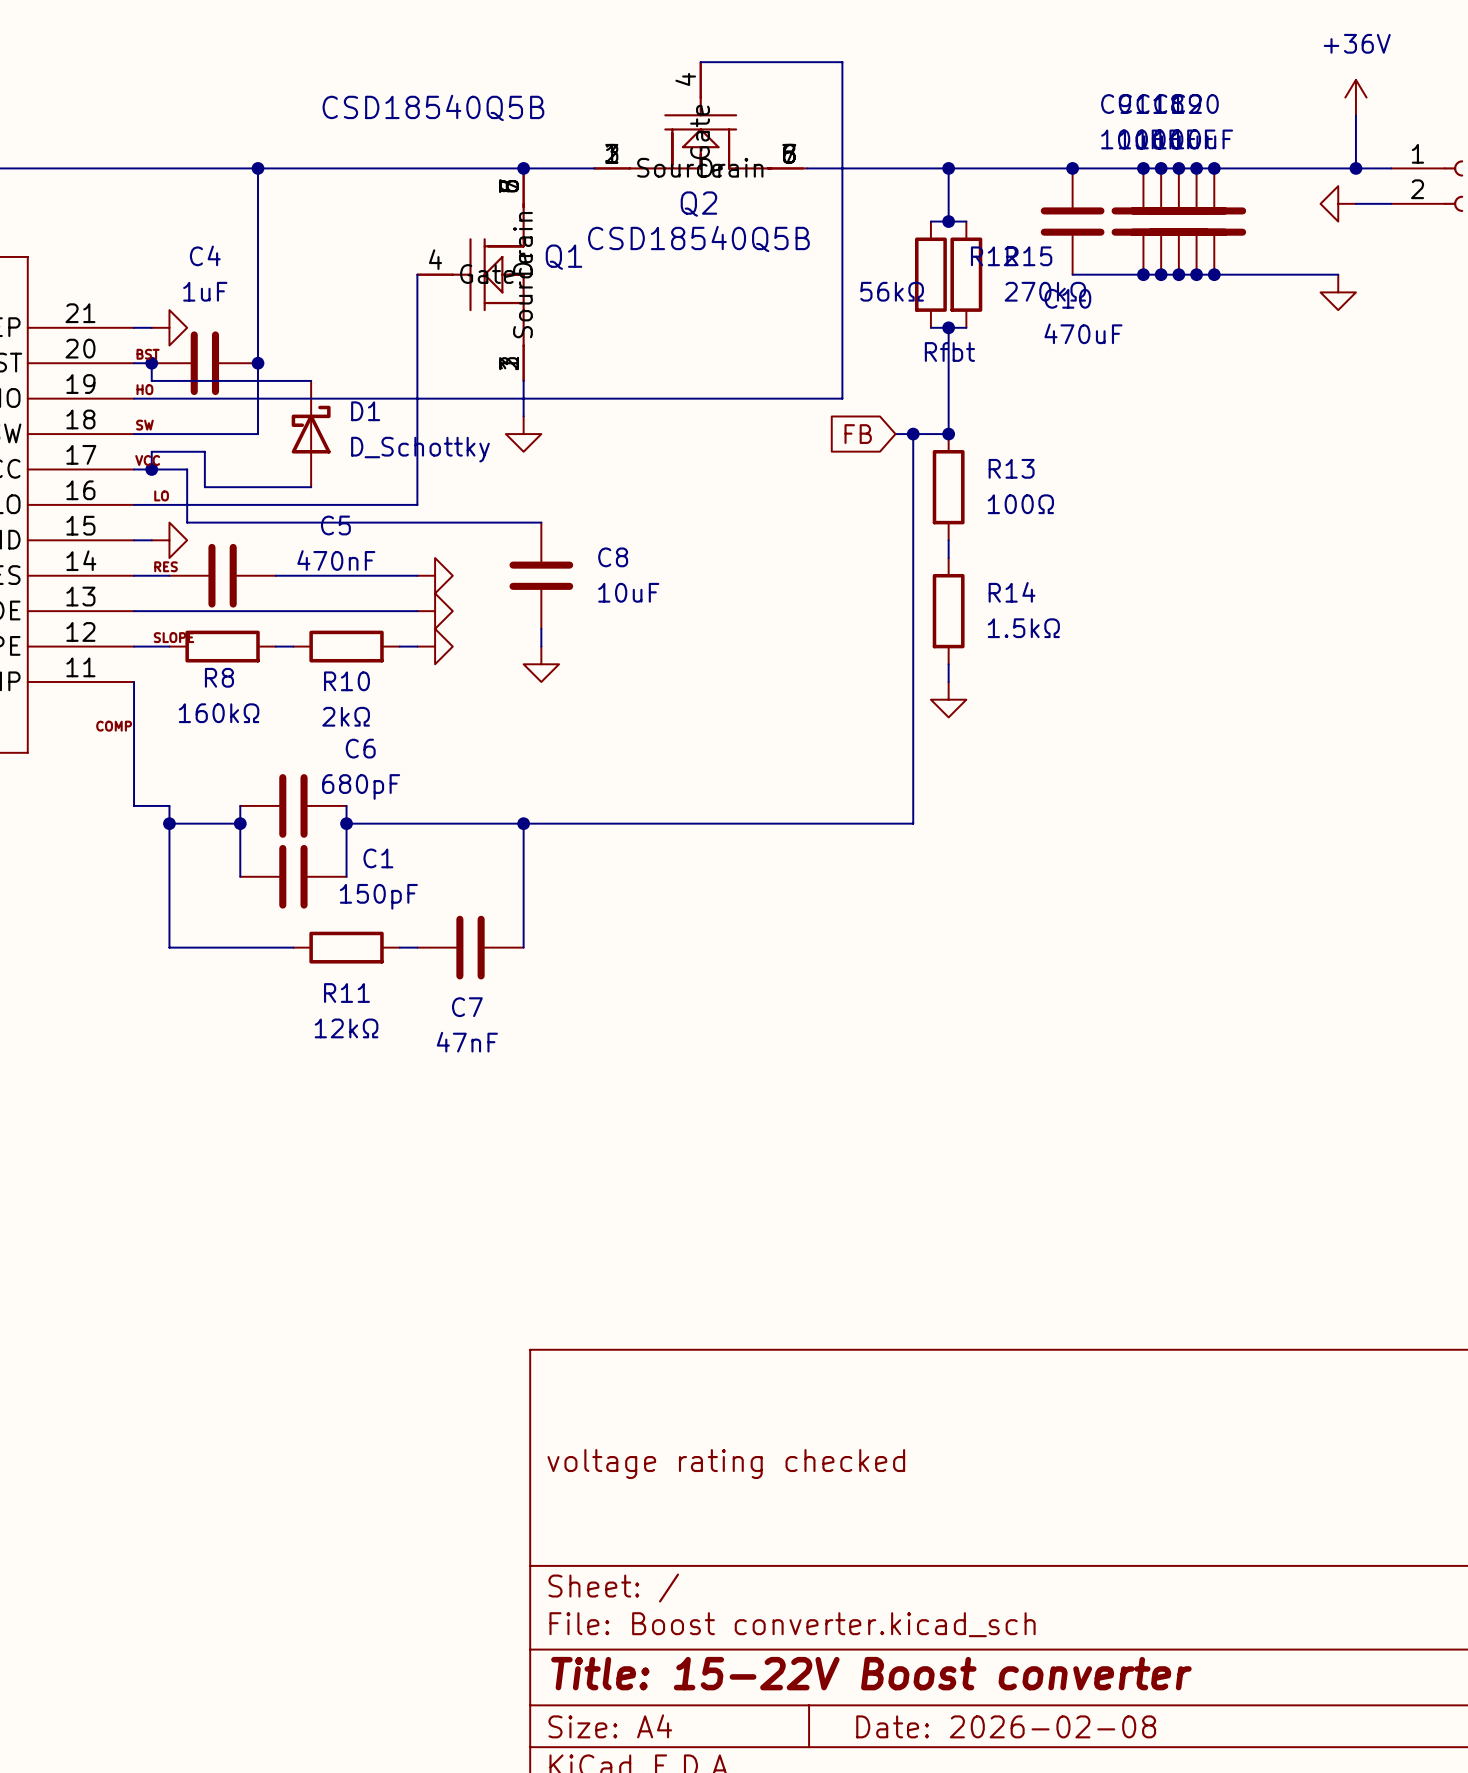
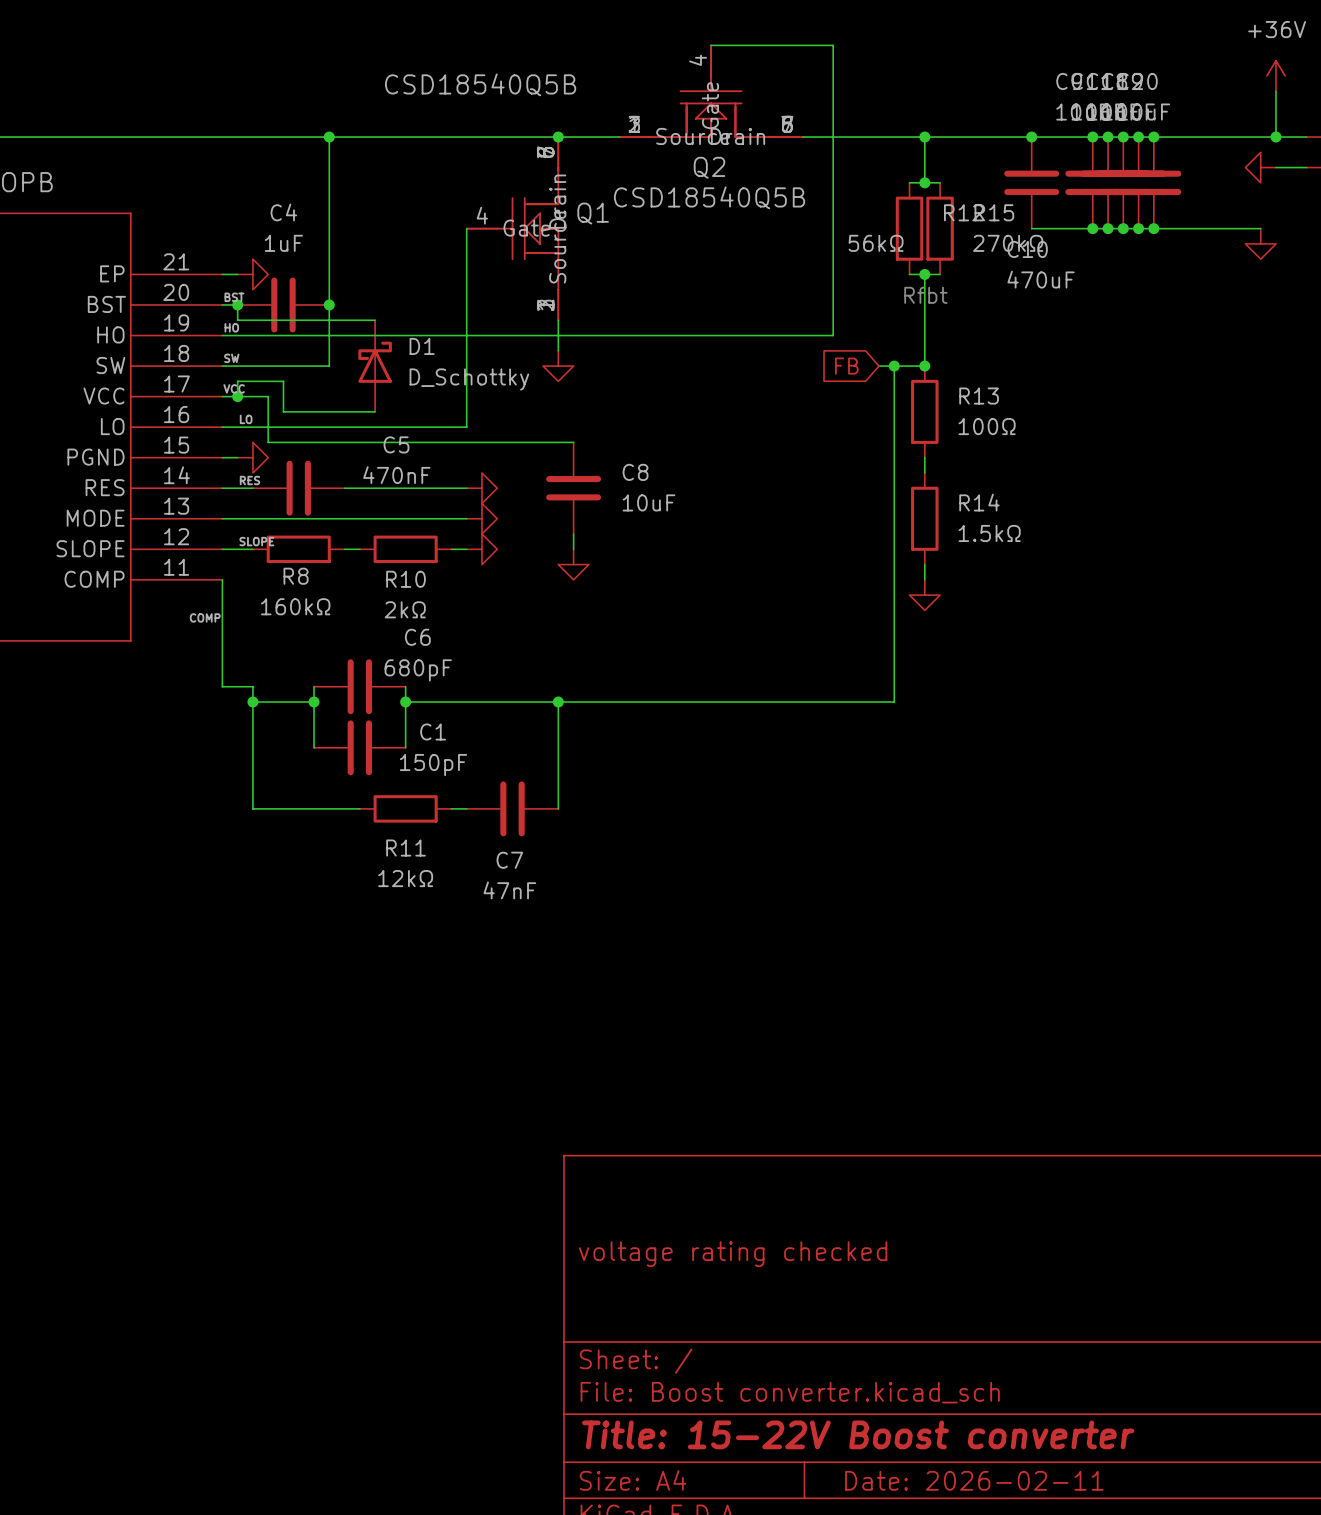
title block: Date: 2026-02-08 (1006, 1726) -> Date: 2026-02-11 (974, 1480)

